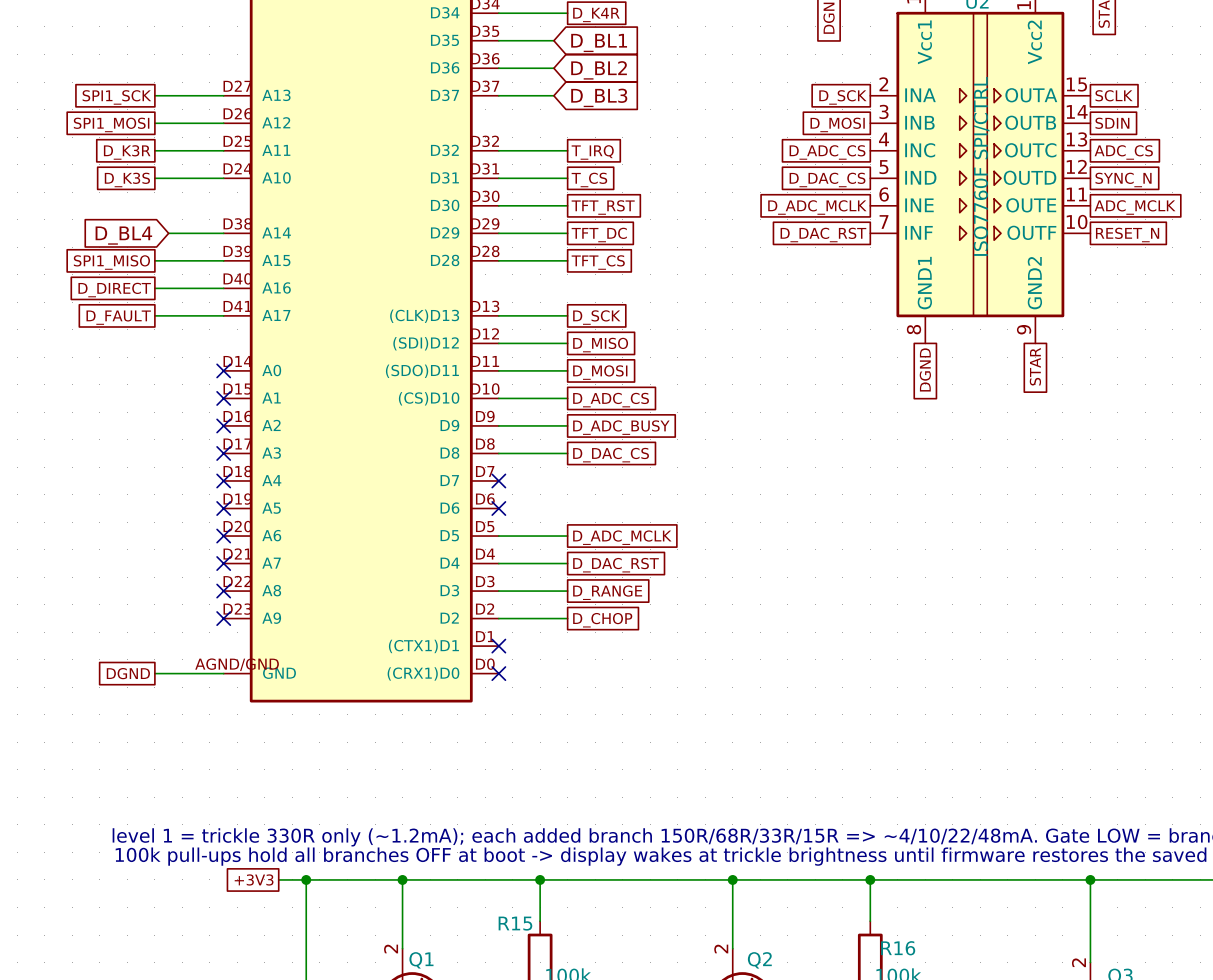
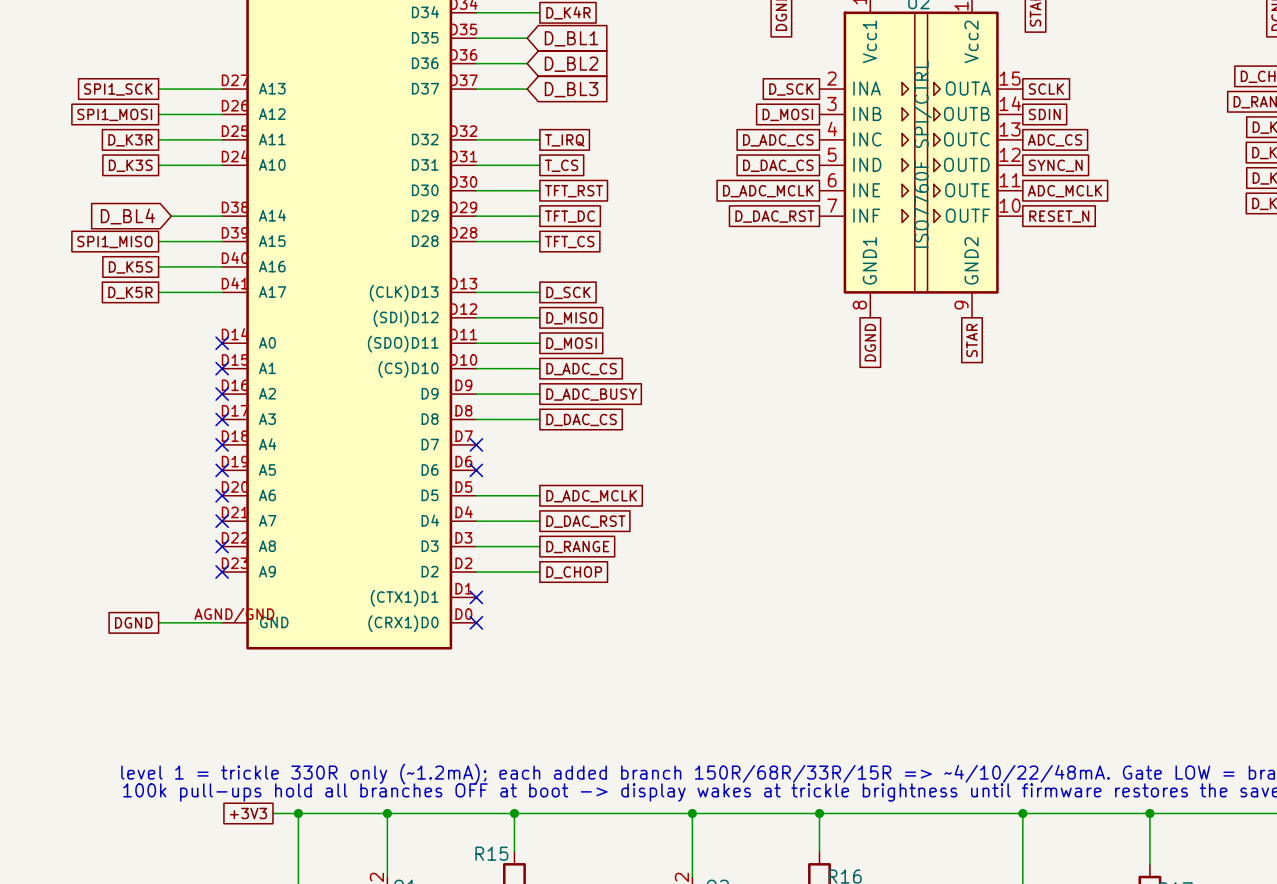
global label: D_DIRECT (114, 290) -> D_K5S (130, 267)
global label: D_FAULT (118, 317) -> D_K5R (130, 292)

